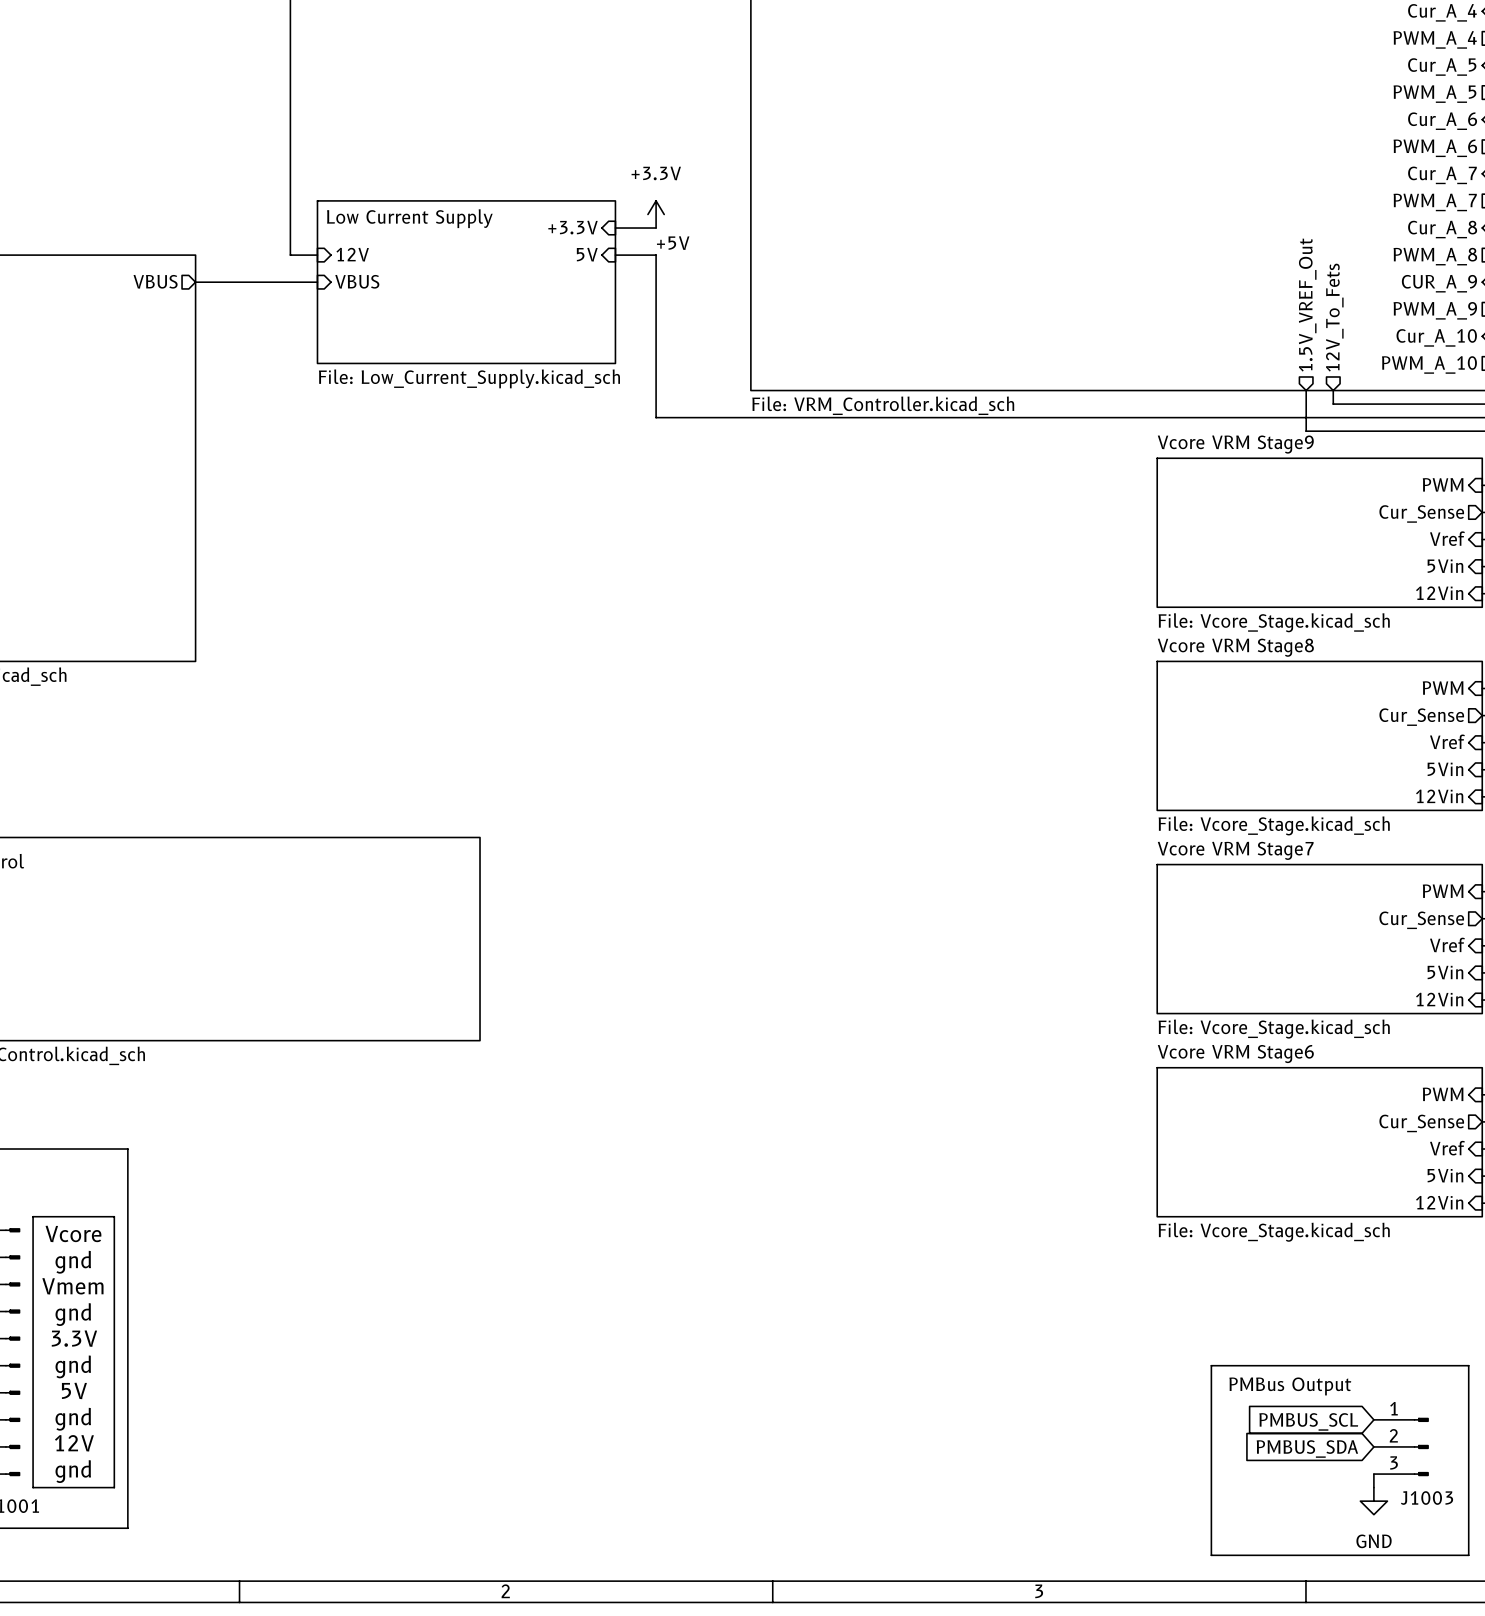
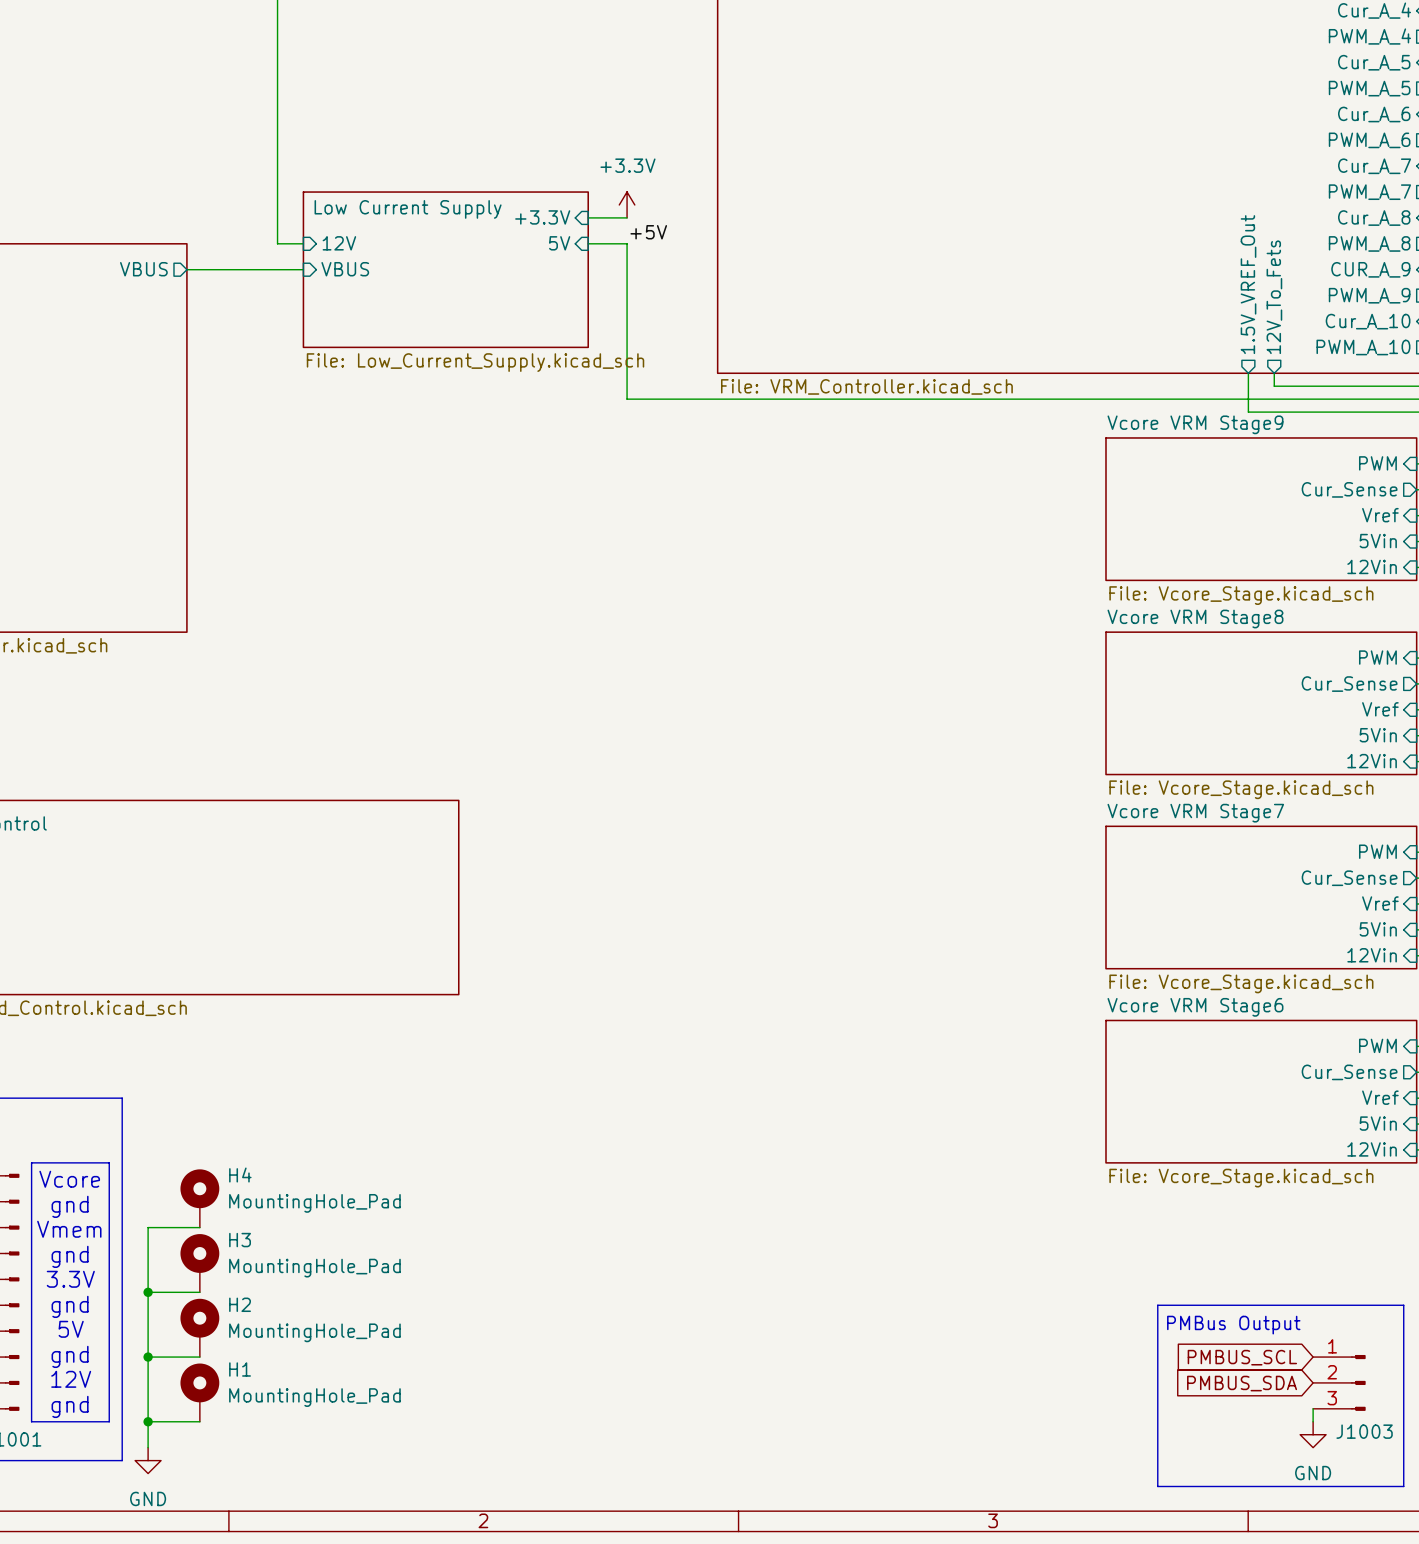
H4: none -> MountingHole_Pad (199, 1198)
wire: none -> (199, 1227) (148, 1227) (148, 1447)
H3: none -> MountingHole_Pad (199, 1263)
wire: none -> (148, 1292) (199, 1292)
junction: none -> (148, 1292)
H2: none -> MountingHole_Pad (199, 1327)
wire: none -> (148, 1357) (199, 1357)
junction: none -> (148, 1357)
H1: none -> MountingHole_Pad (199, 1392)
wire: none -> (148, 1421) (199, 1421)
junction: none -> (148, 1421)
power symbol: none -> GND (148, 1460)

